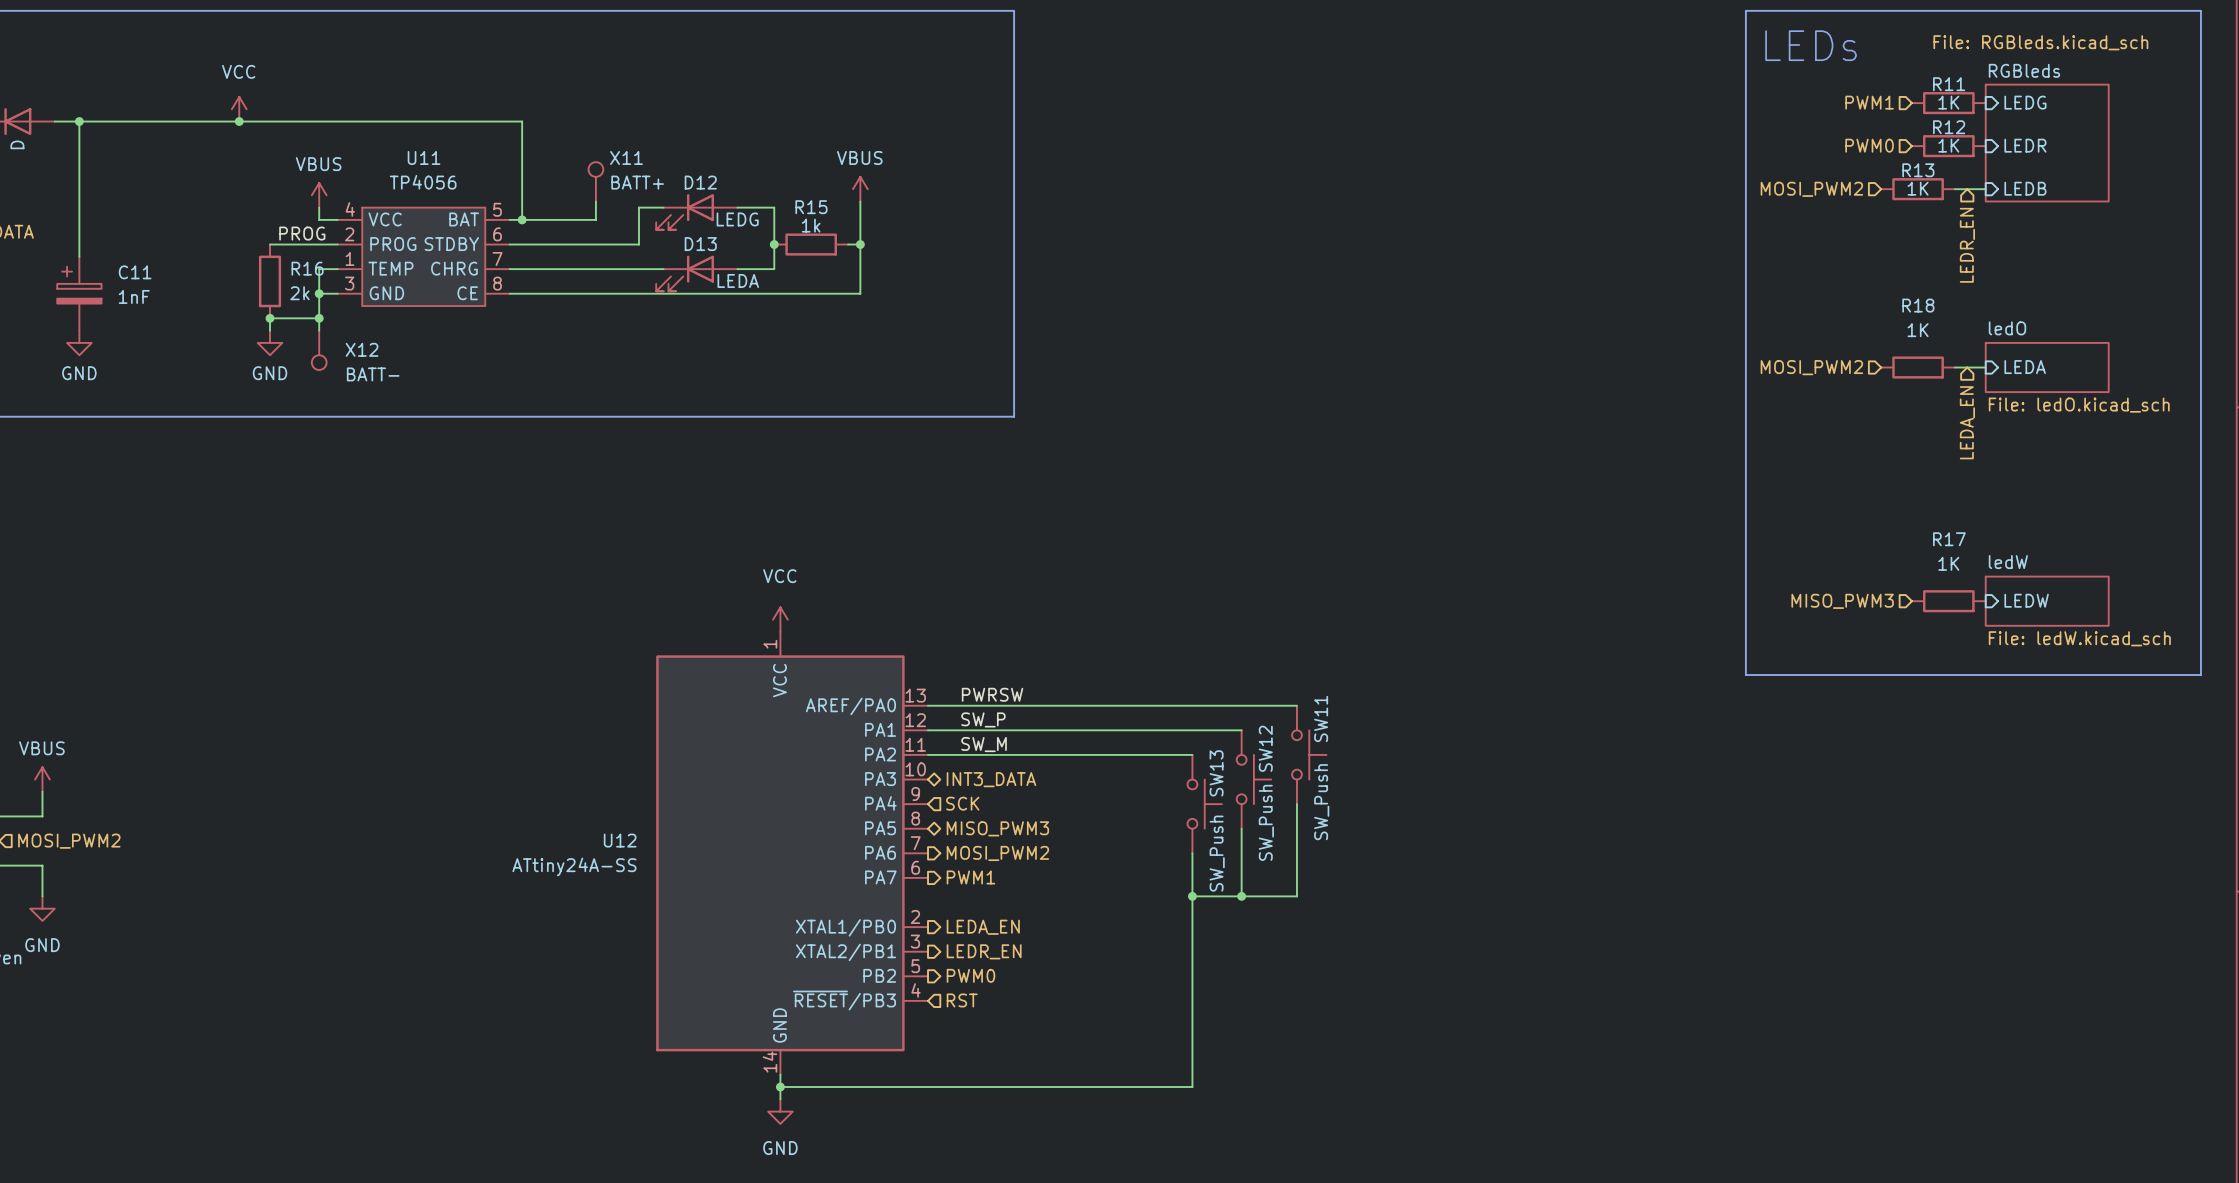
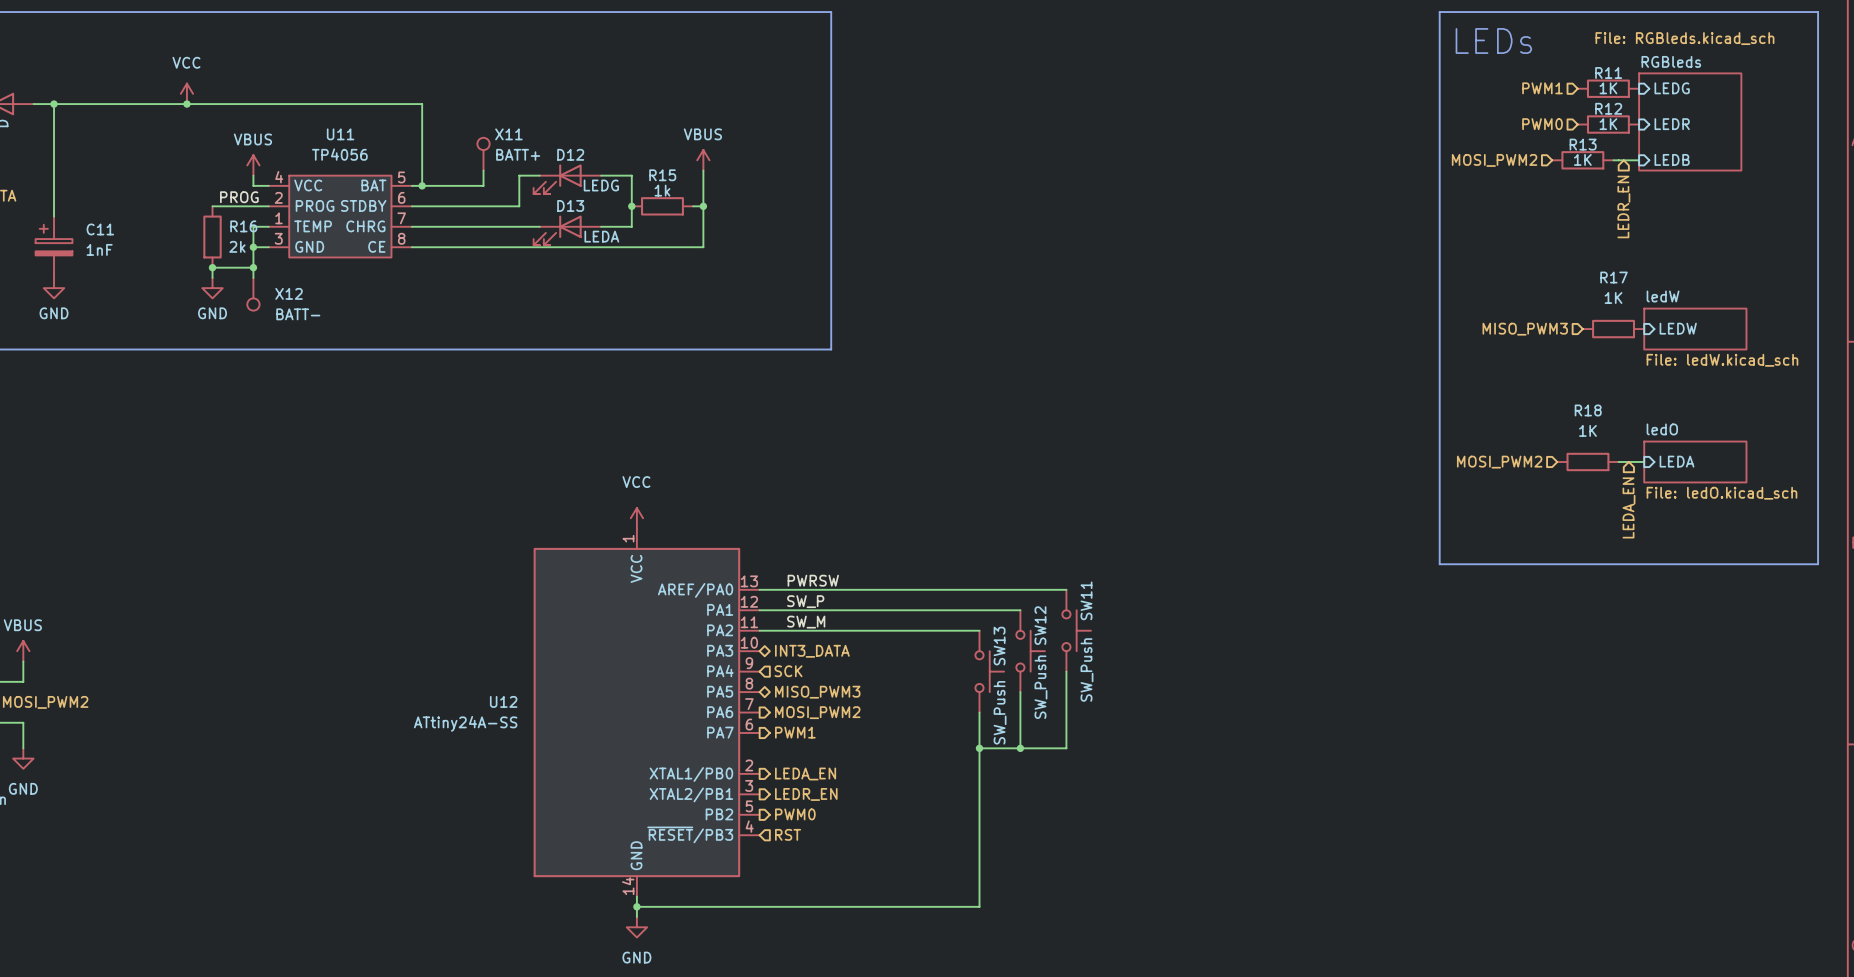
hierarchical label position: MOSI_PWM2 (1811, 367) -> MOSI_PWM2 (1499, 462)
R18 position: (1918, 367) -> (1587, 461)
wire: (1954, 367) (1985, 367) -> (1618, 461) (1644, 461)
sheet pin position: LEDA (2025, 367) -> LEDA (1677, 461)
sheet ledO position: (2047, 367) -> (1695, 461)
hierarchical label position: LEDA_EN (1967, 422) -> LEDA_EN (1628, 507)
sheet pin position: LEDW (2026, 600) -> LEDW (1678, 328)
hierarchical label position: MISO_PWM3 (1842, 601) -> MISO_PWM3 (1525, 329)
R17 position: (1948, 601) -> (1613, 329)
sheet ledW position: (2047, 601) -> (1695, 329)

